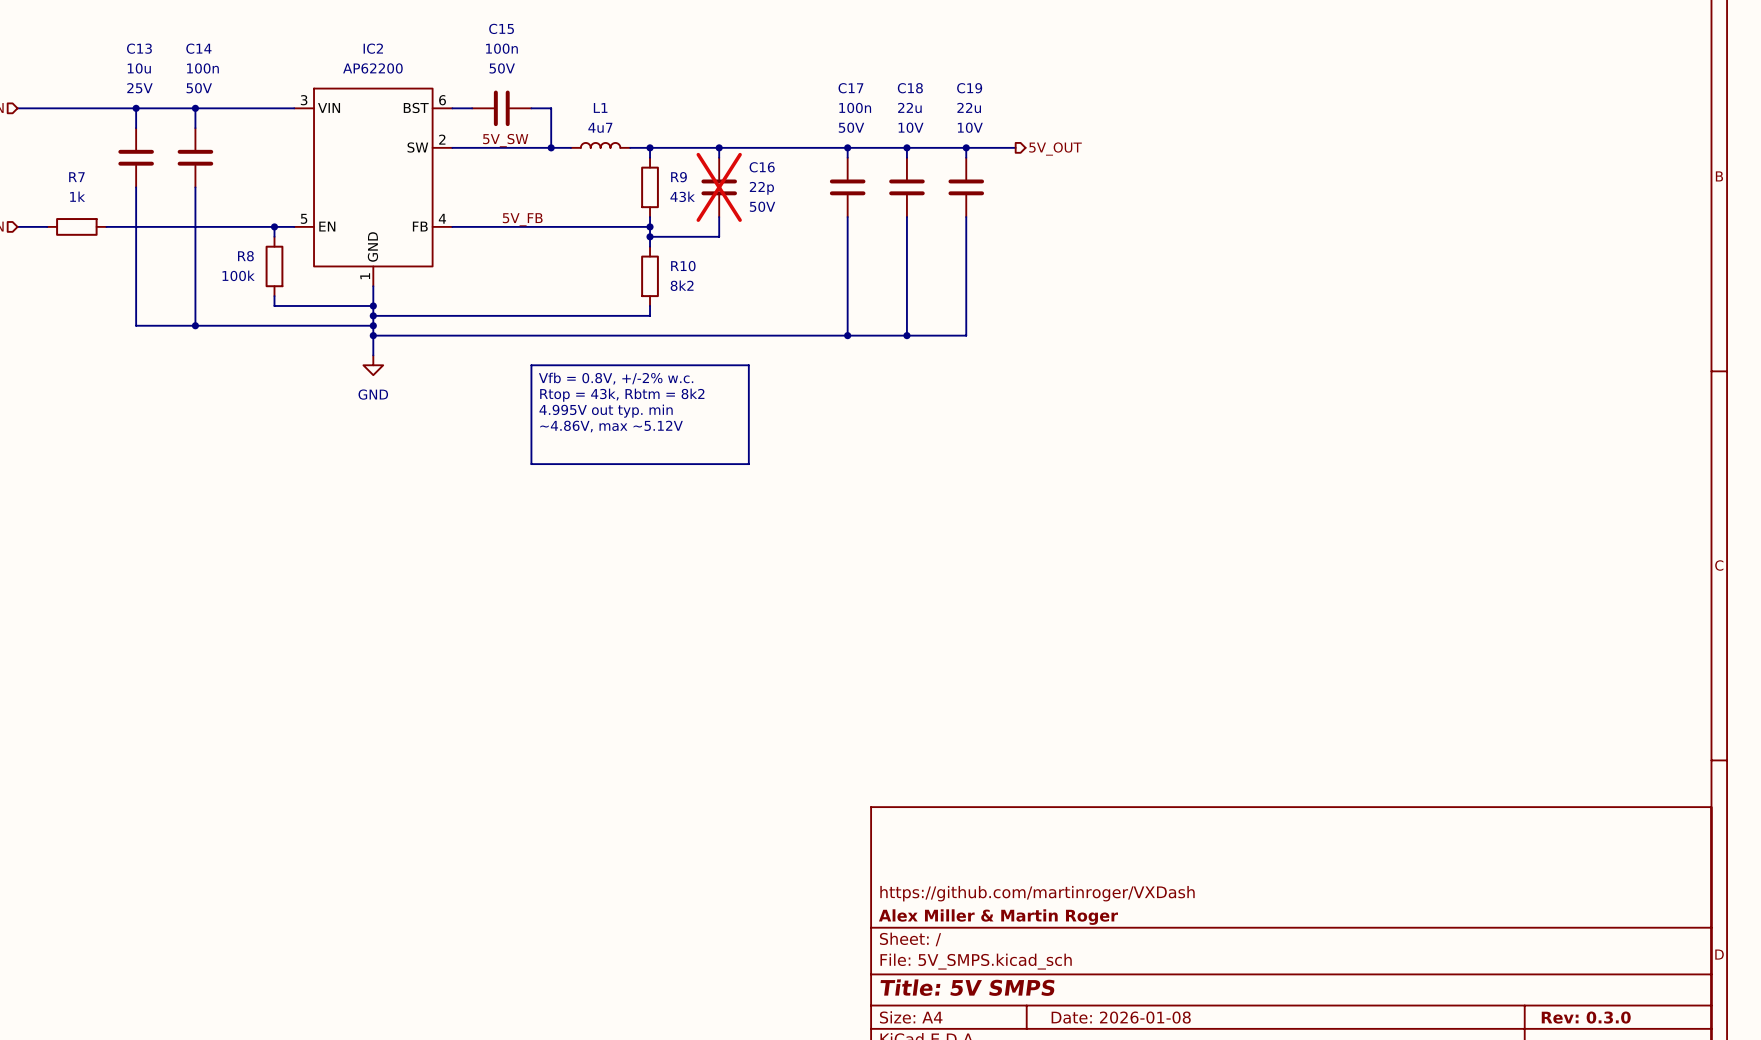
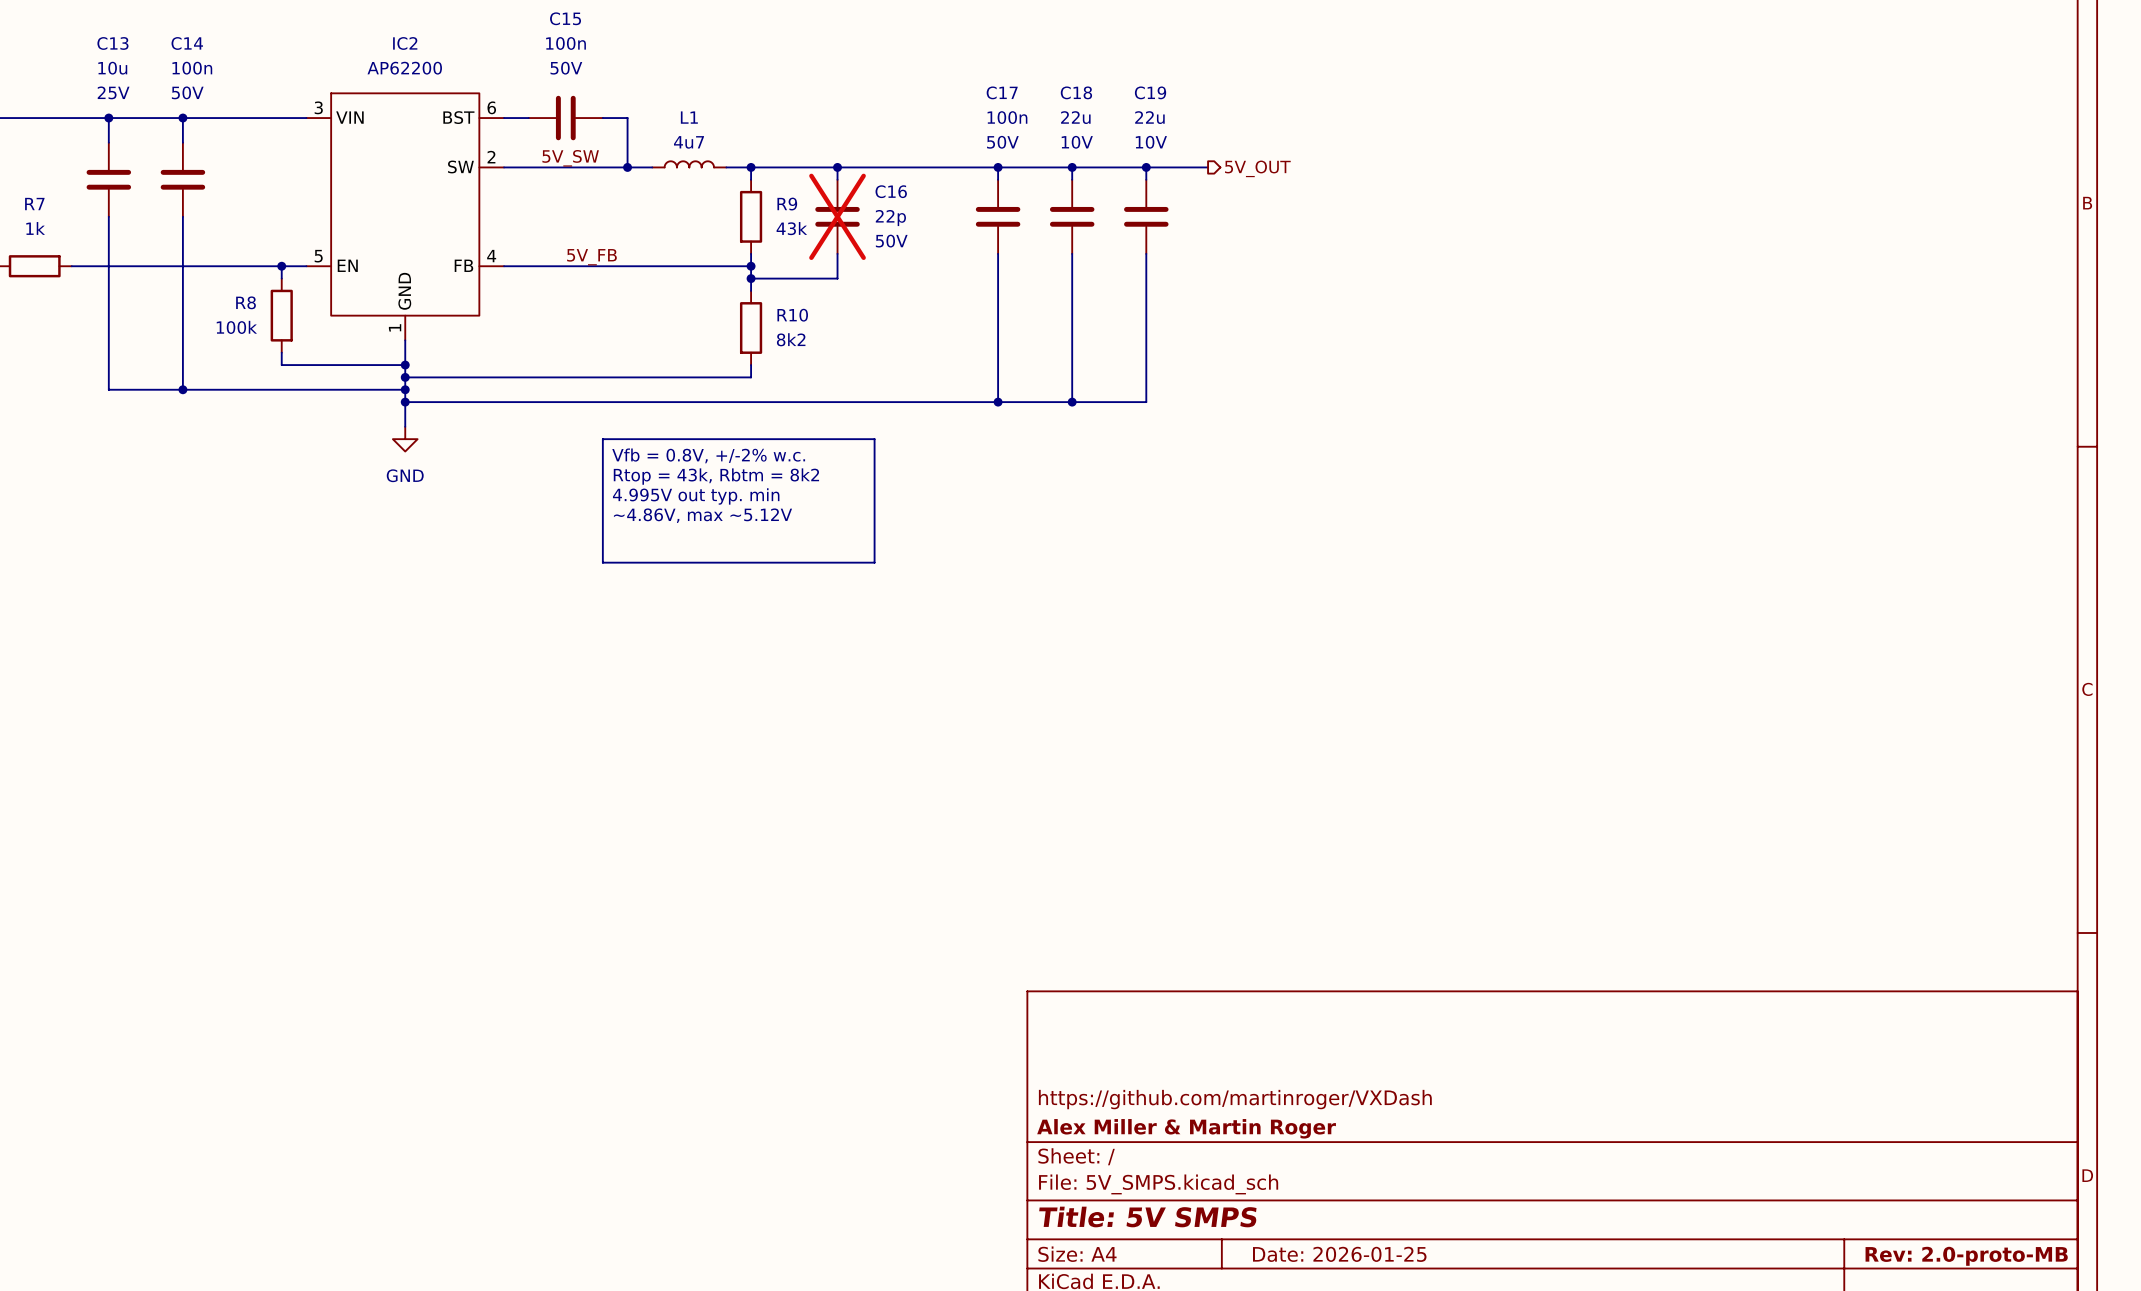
title block: Date: 2026-01-08 (1121, 1017) -> Date: 2026-01-25 (1339, 1254)
title block: Rev: 0.3.0 (1586, 1017) -> Rev: 2.0-proto-MB (1966, 1256)

